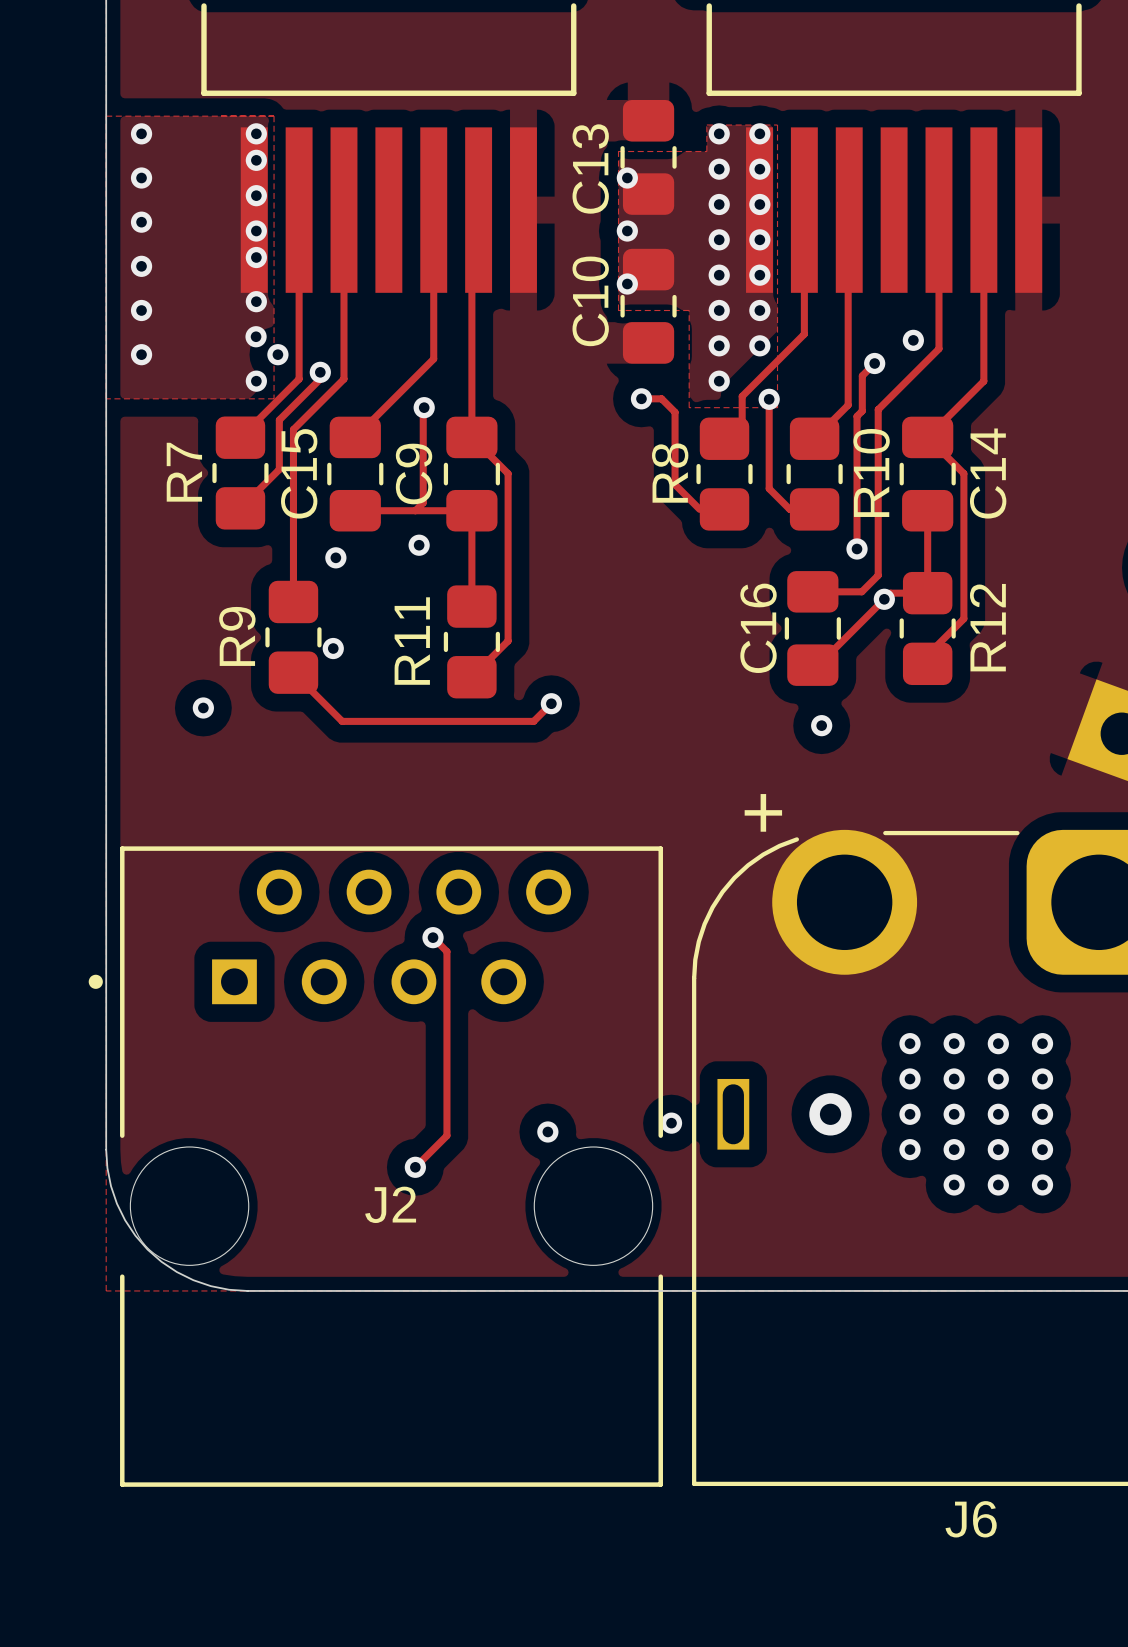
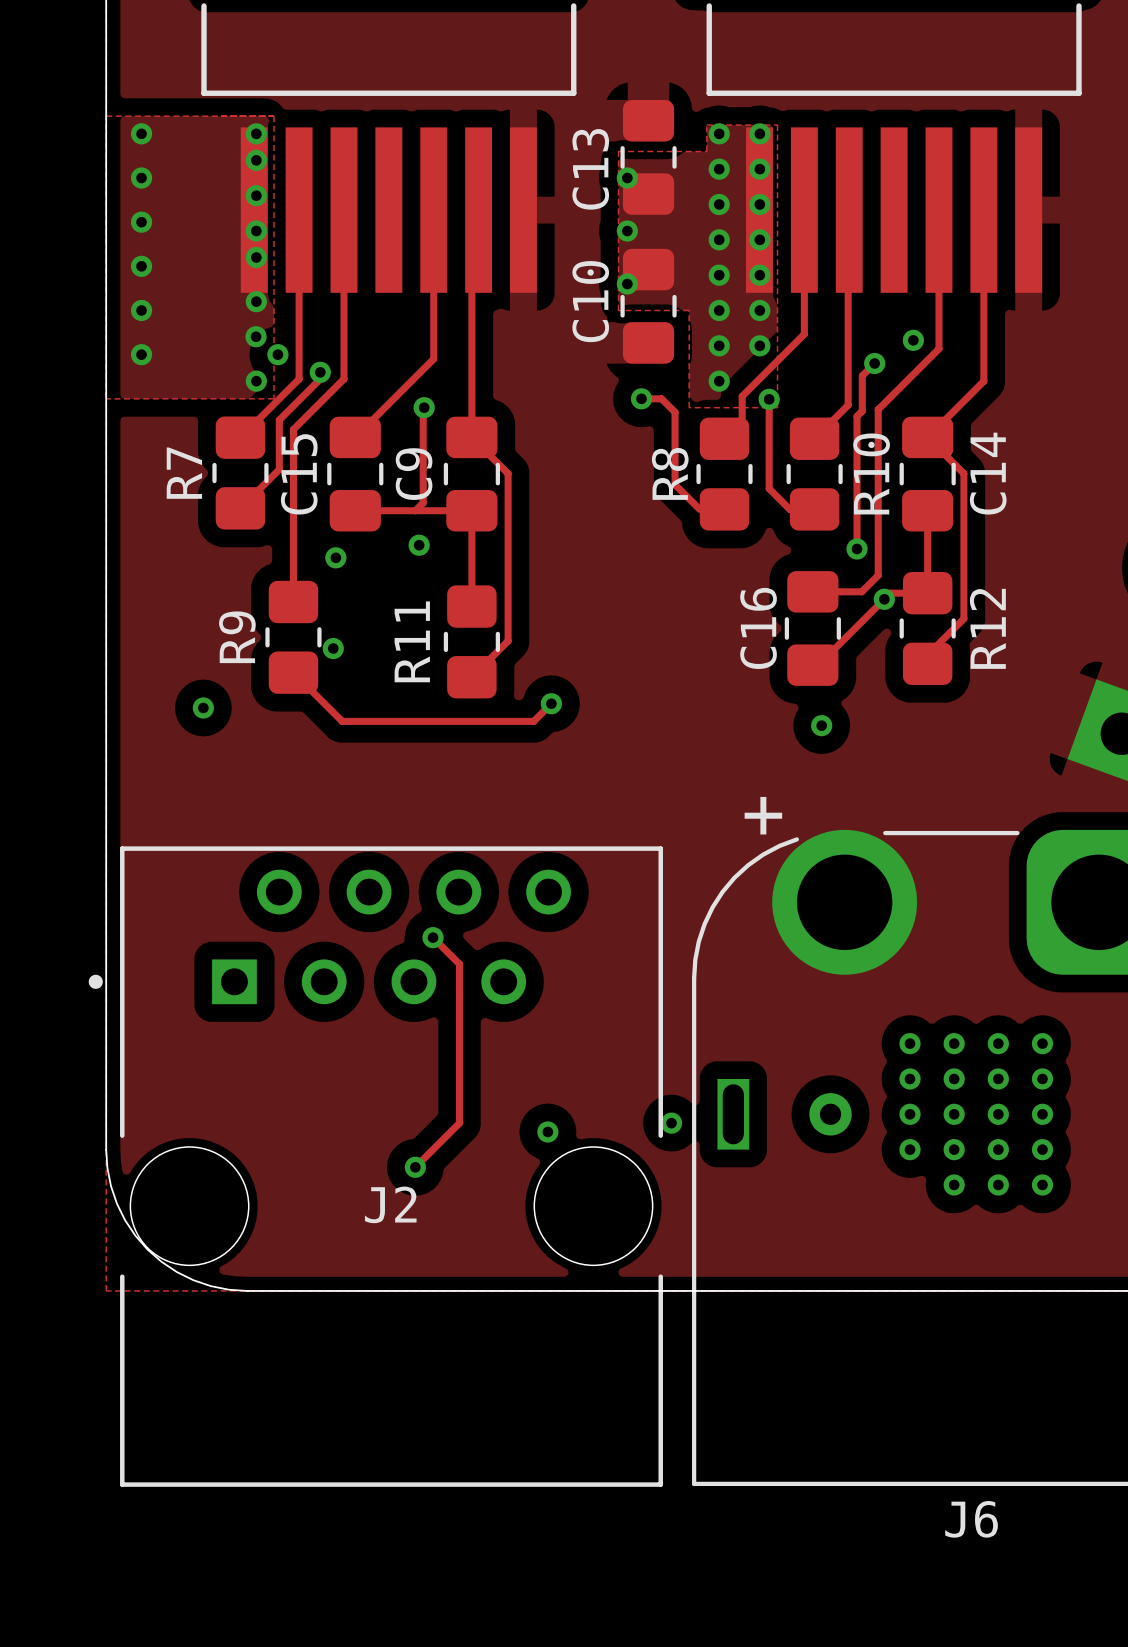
track: (446, 951) (446, 1135) -> (446, 951) (459, 964) (459, 1123) (446, 1135)

